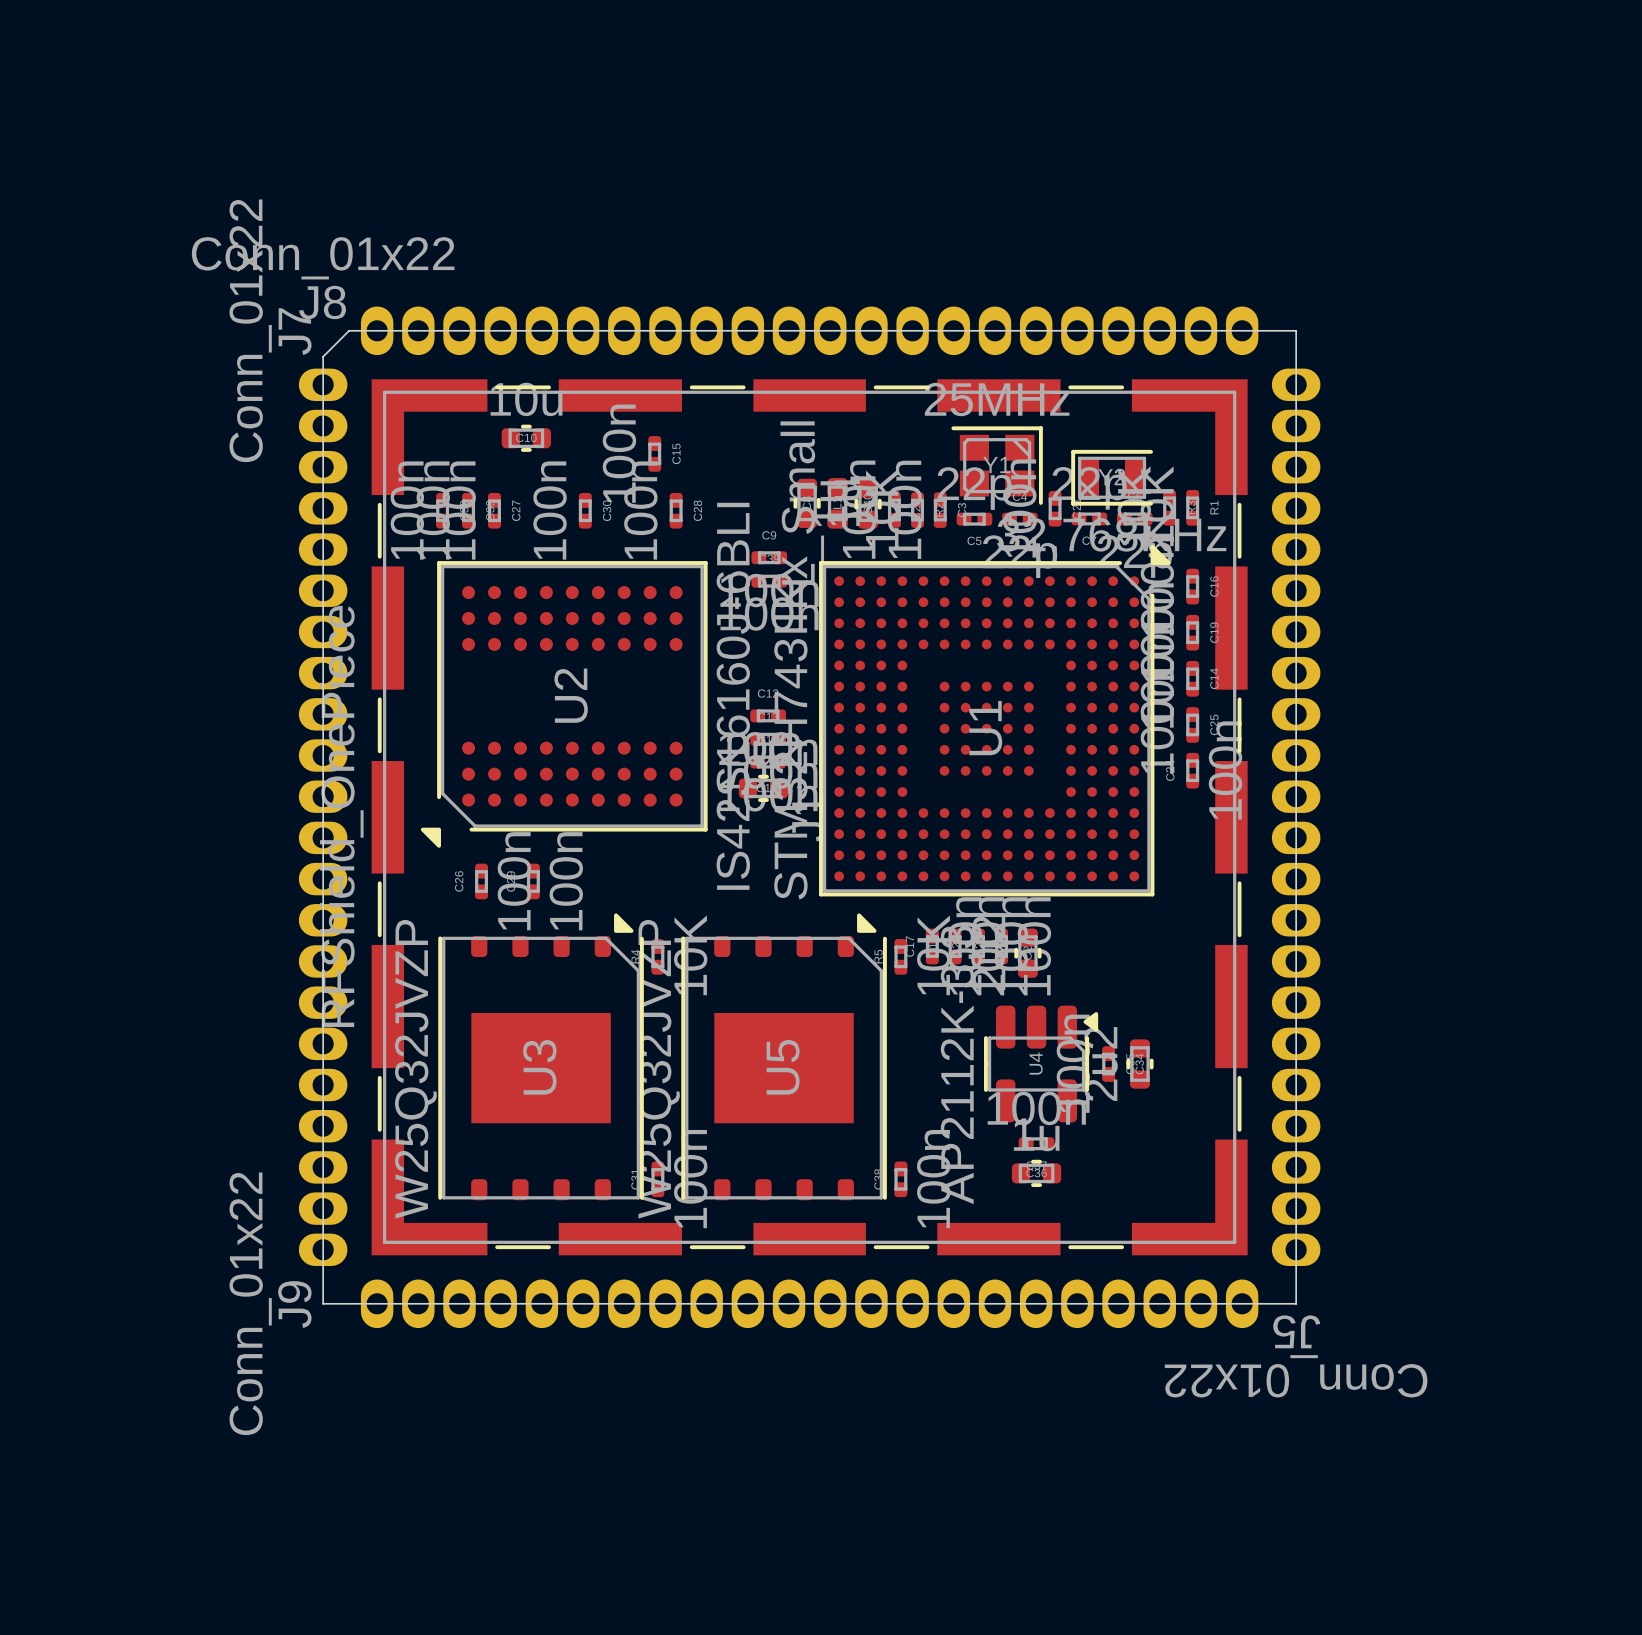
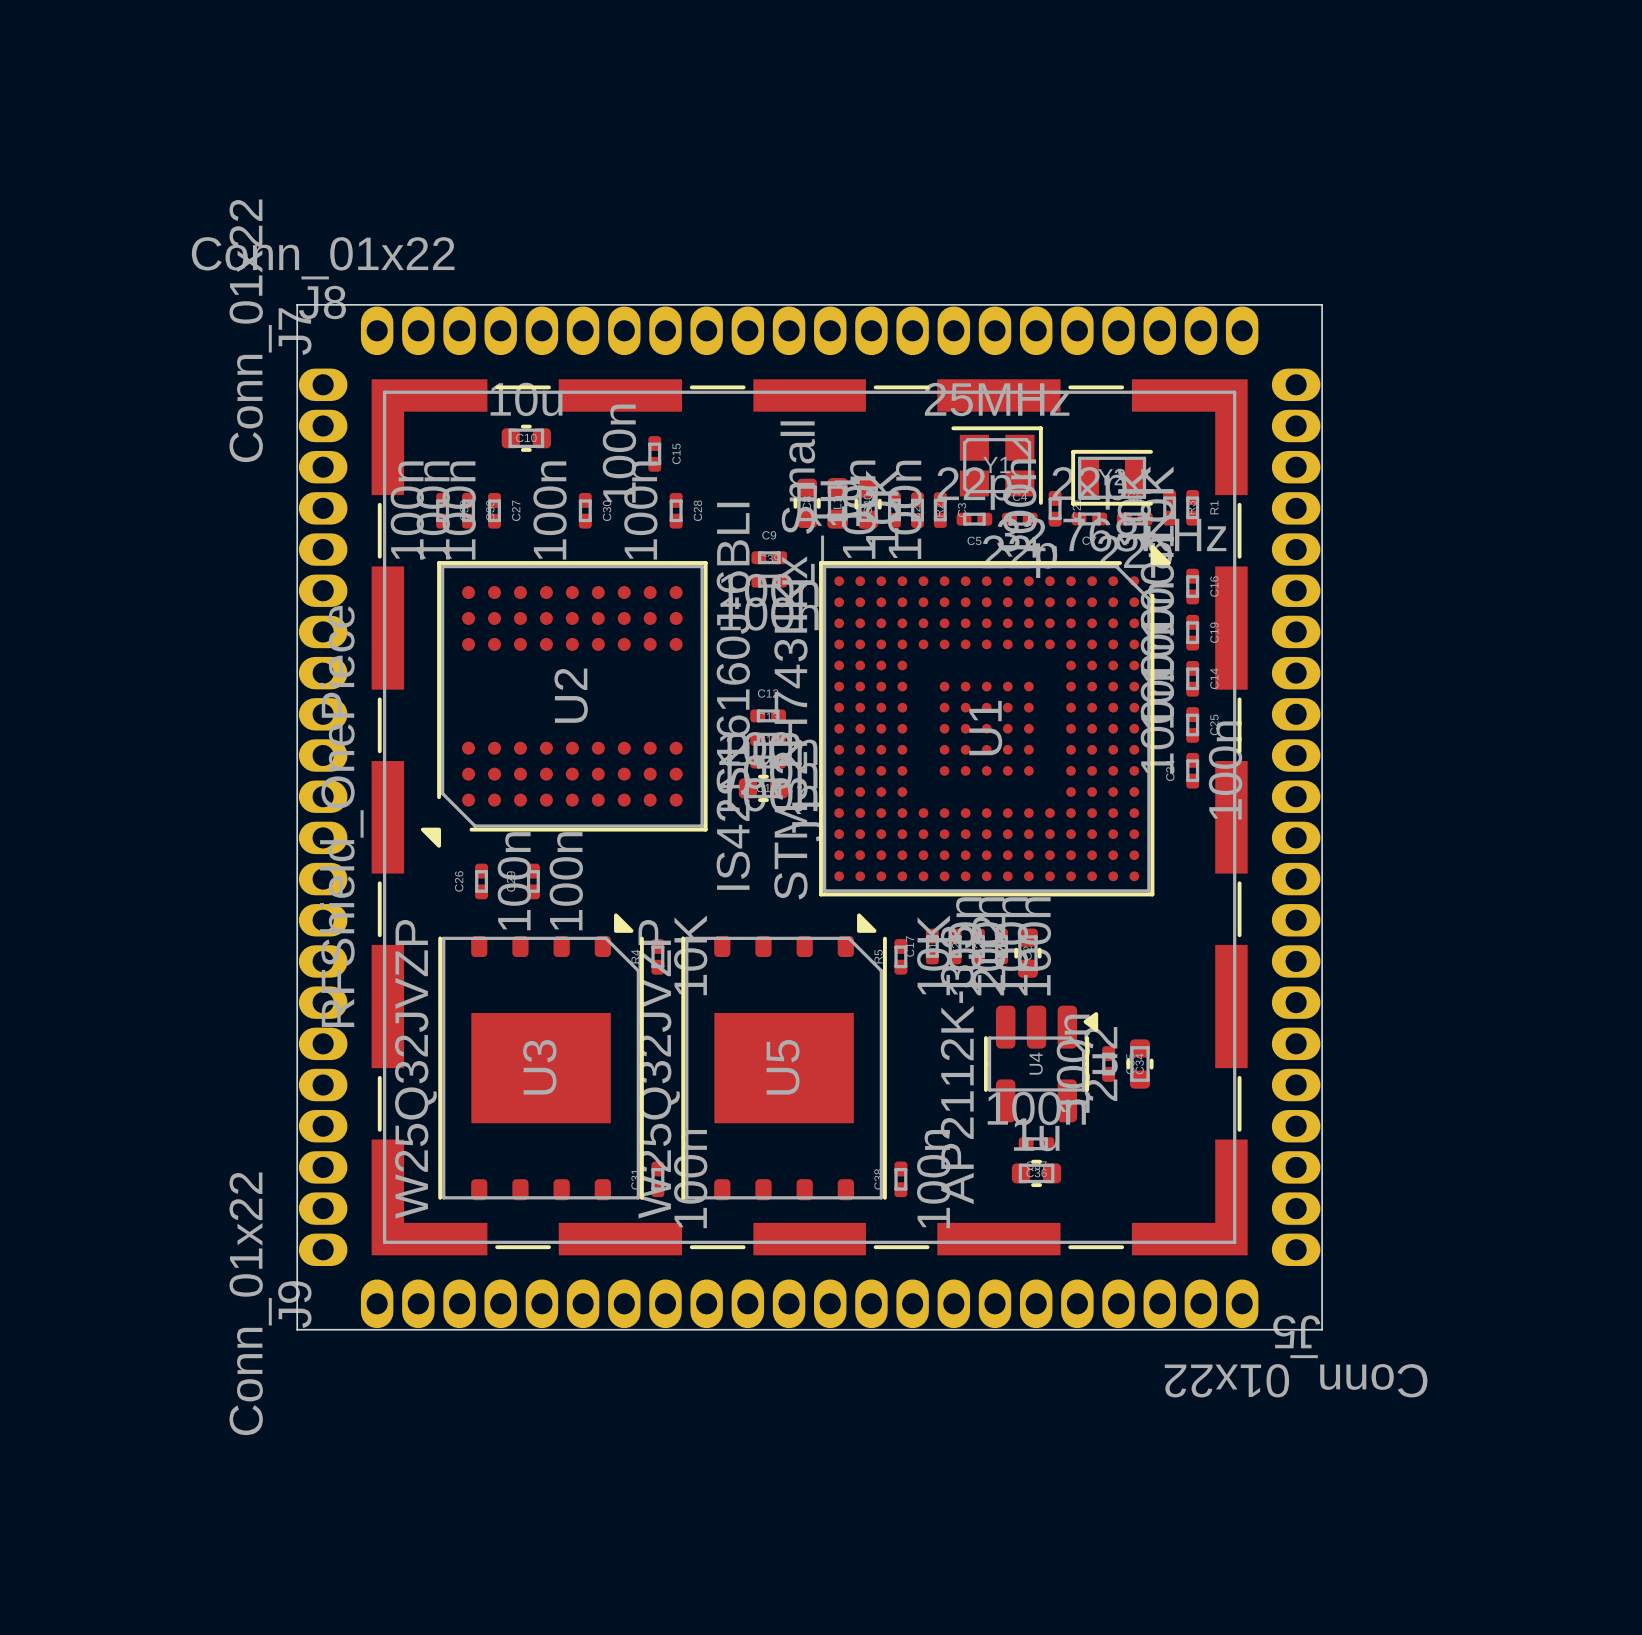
board edge: (349, 330) (323, 356) (323, 1303) (1296, 1303) (1296, 330) (349, 330) -> (297, 304) (297, 1329) (1322, 1329) (1322, 304) (297, 304)

